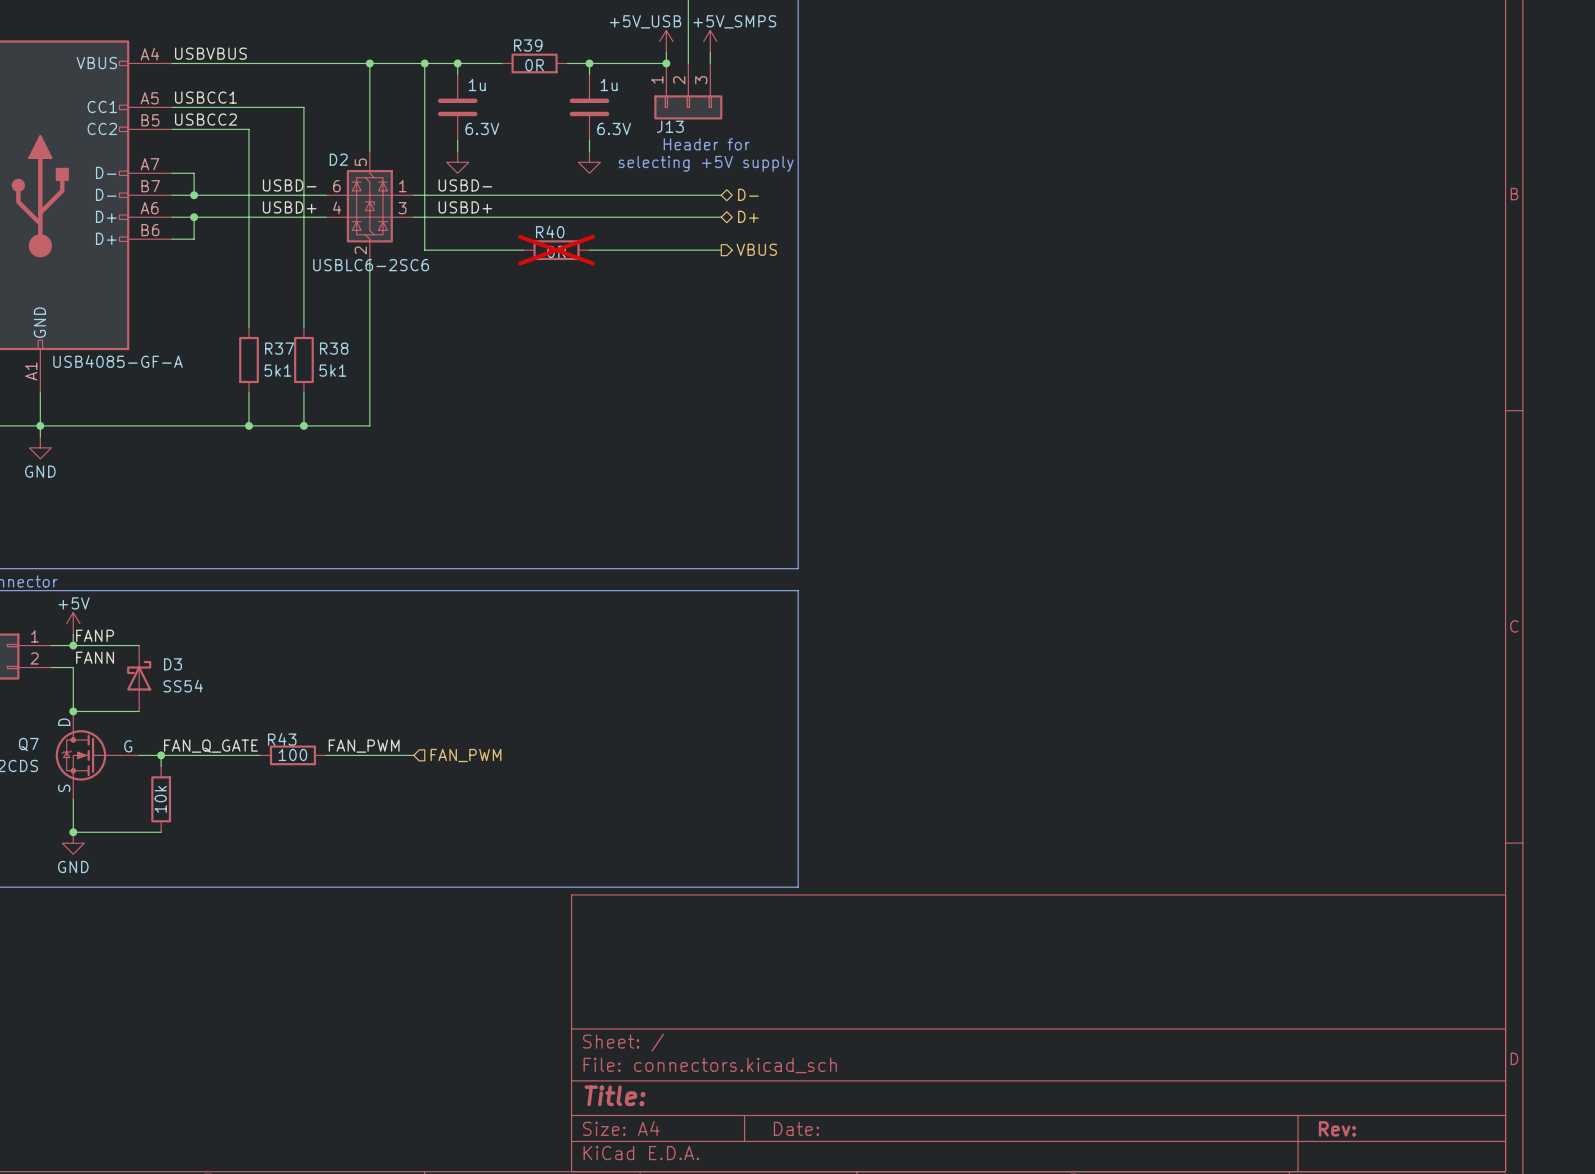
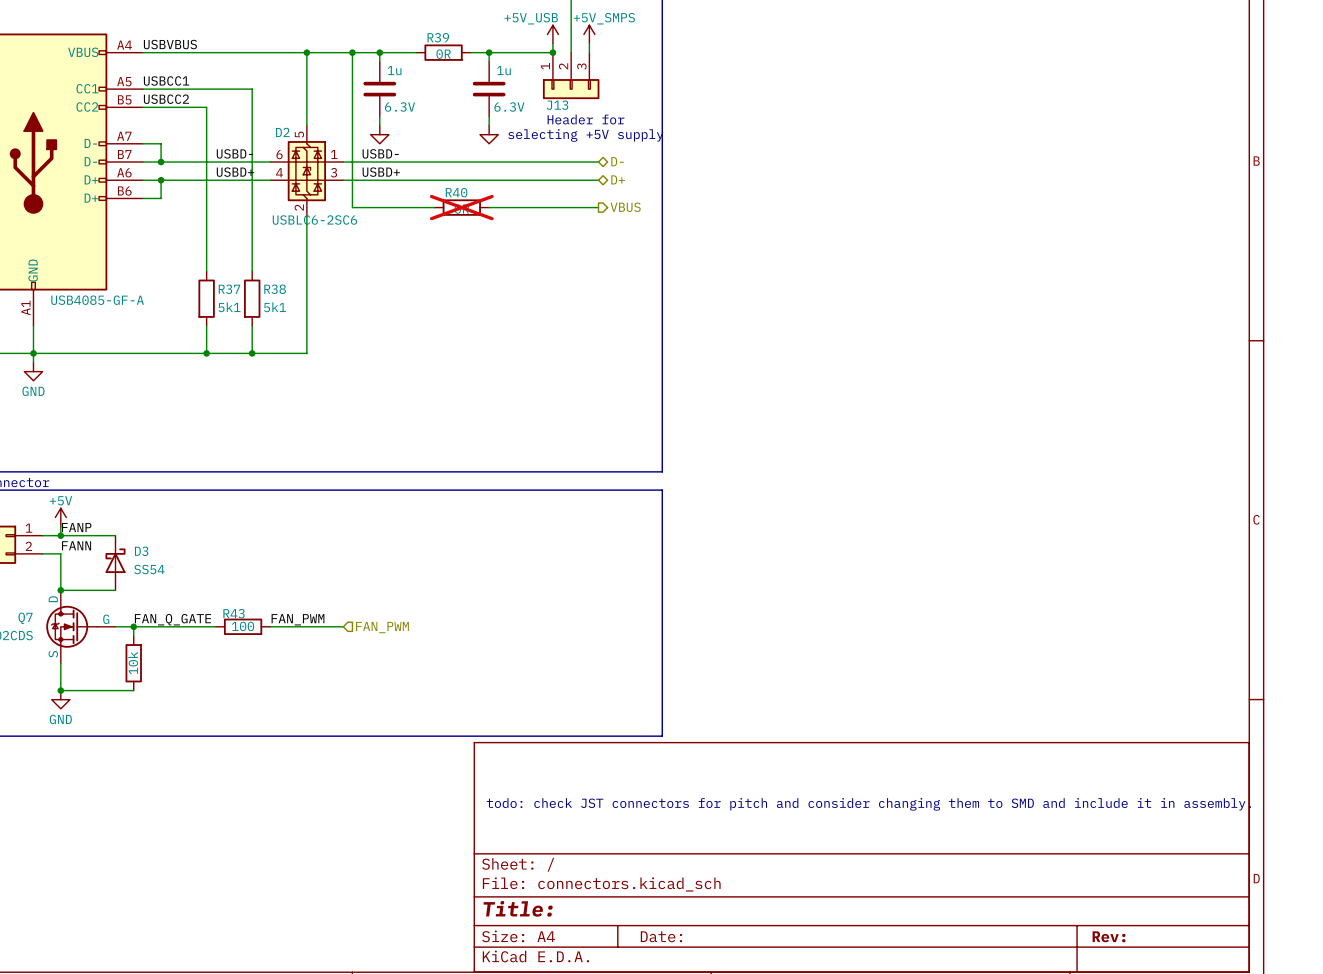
text: none -> todo: check JST connectors for pitch and consider changing them to SMD and include it in assembly. (868, 804)

